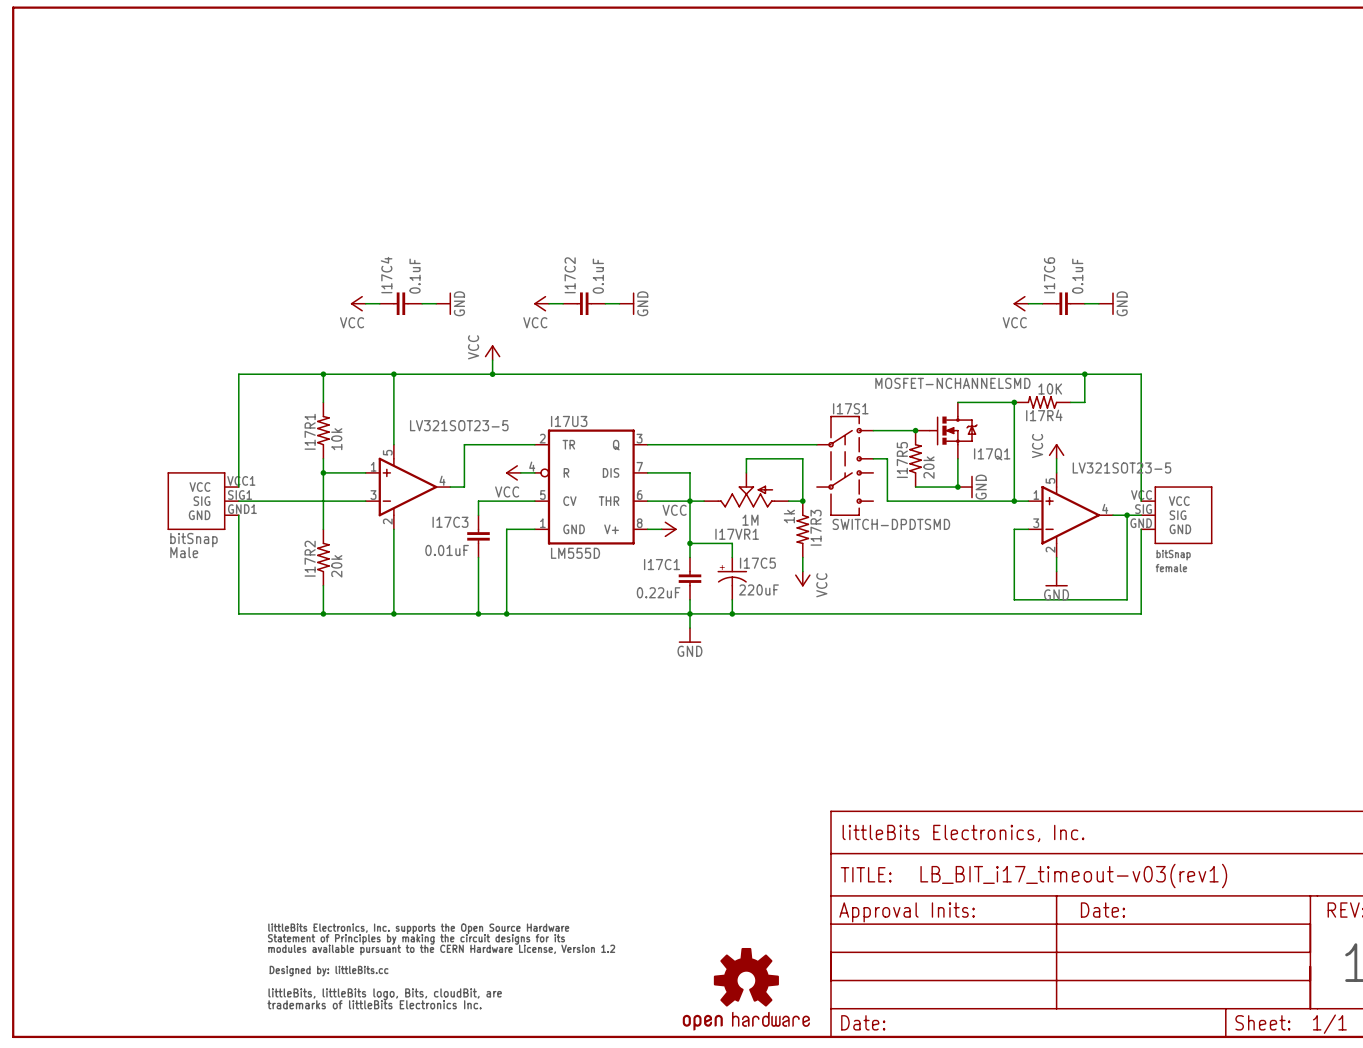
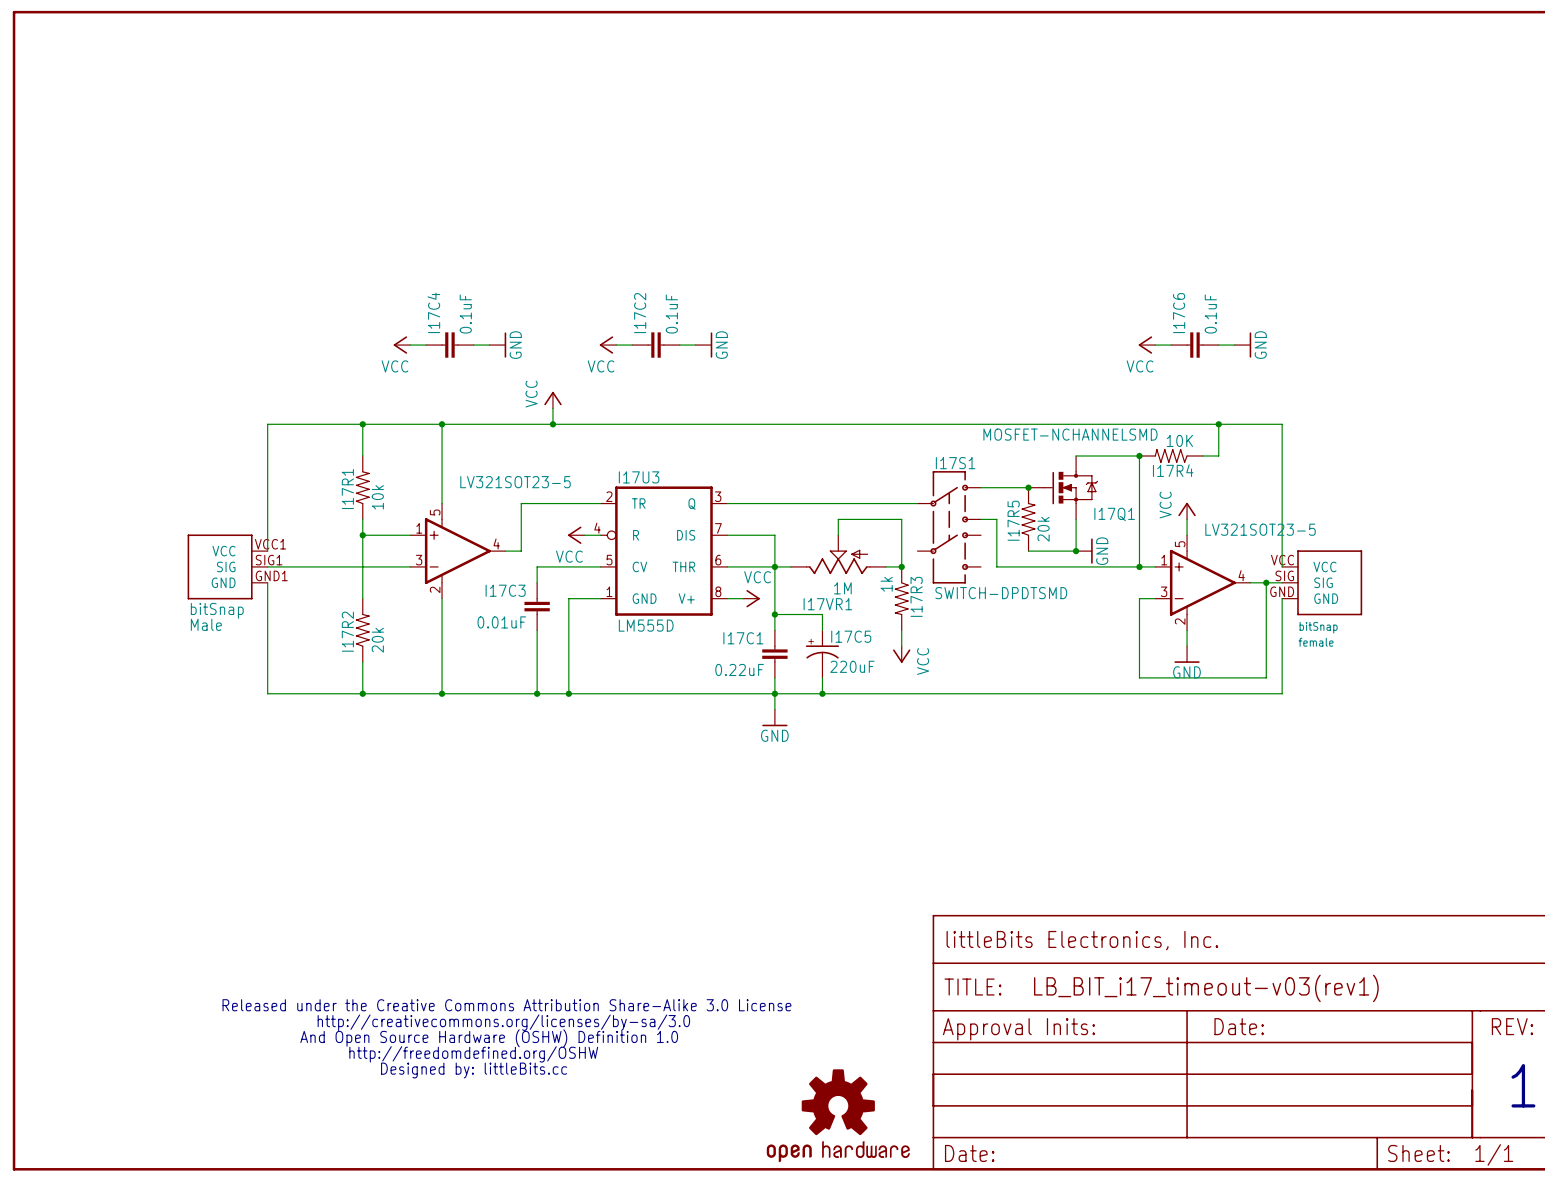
part: none -> (506, 1038)
part: (441, 966) -> none

